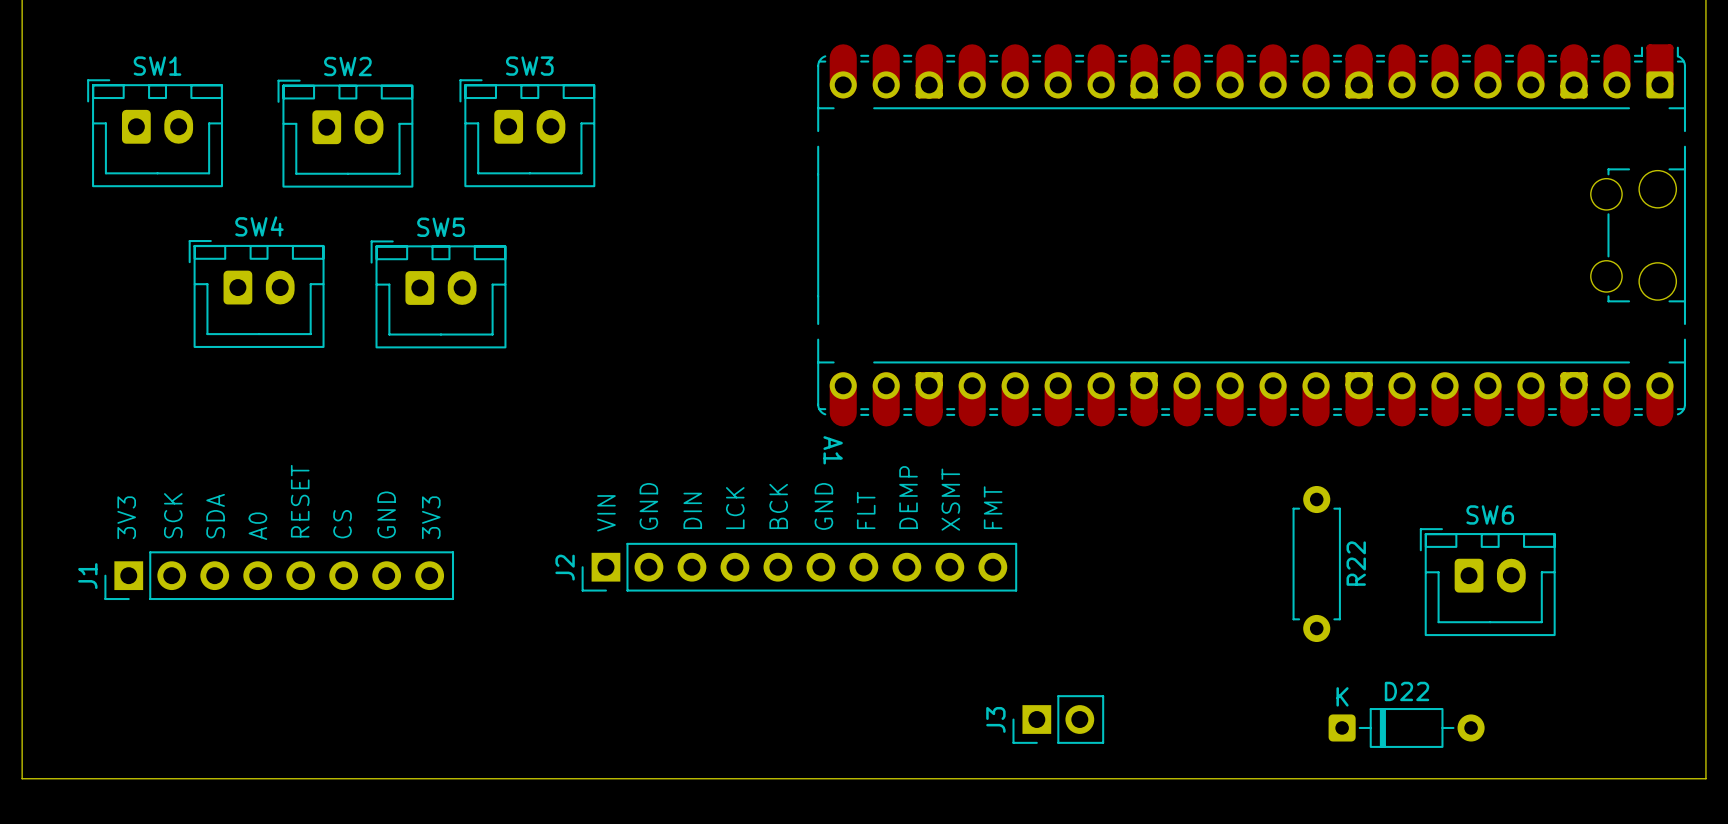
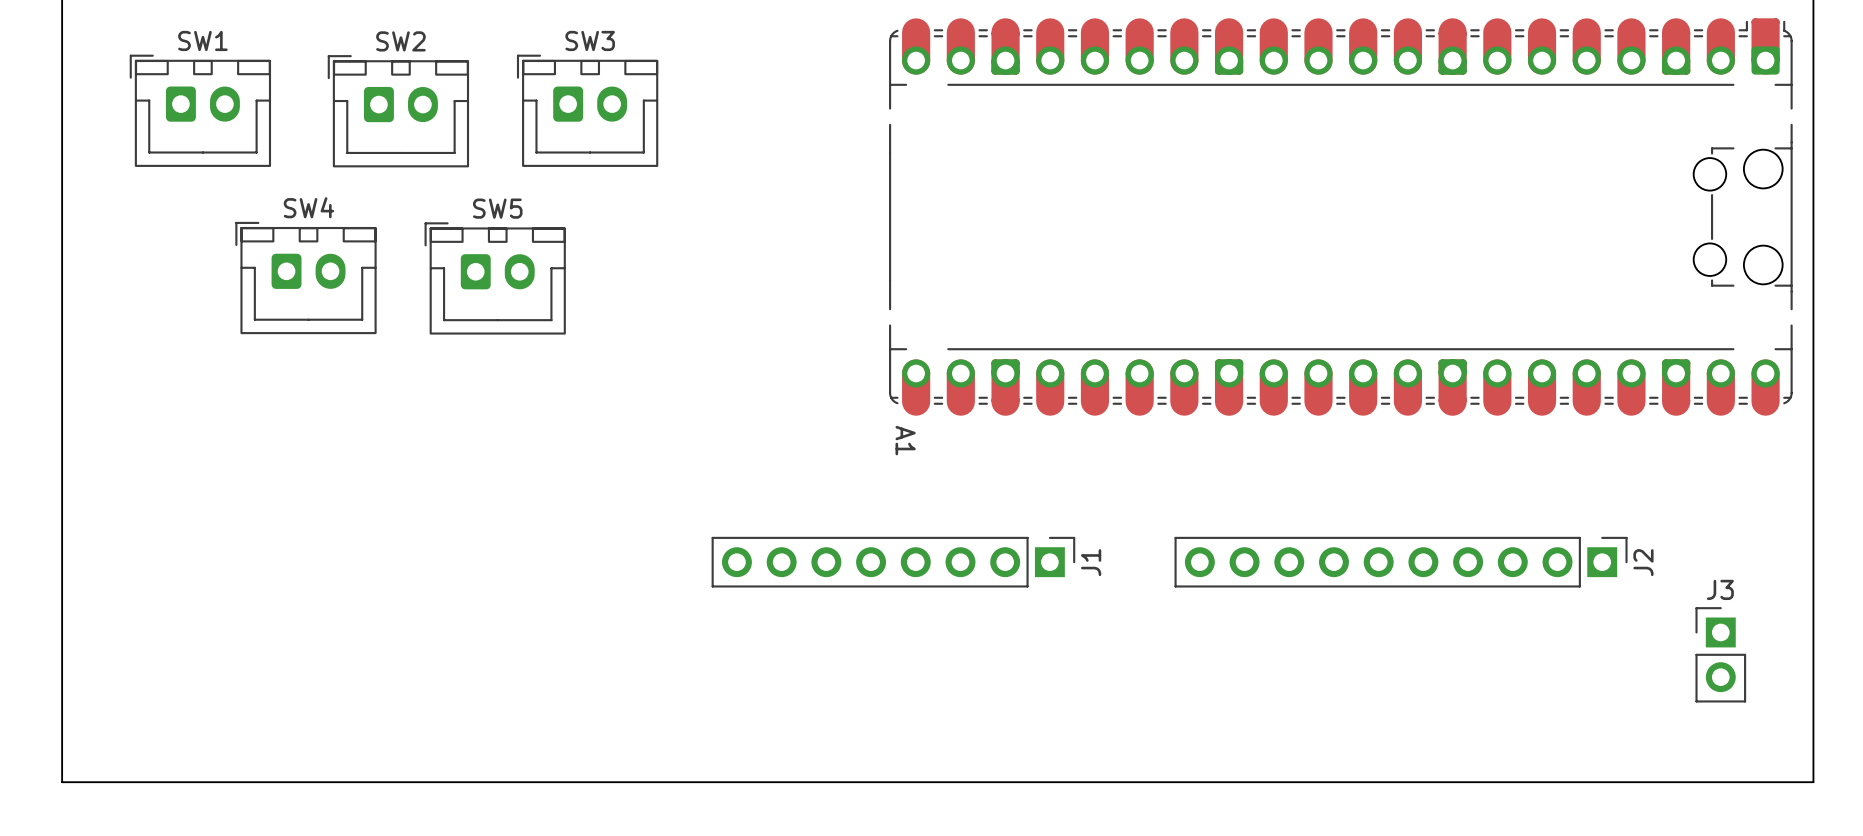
J2 footprint: [581, 542, 1018, 592] -> [1174, 536, 1628, 588]
J1 footprint: [104, 551, 455, 601] -> [711, 536, 1076, 588]
R22: (1316, 563) -> none
J2 name position: J2 (565, 567) -> J2 (1643, 562)
J1 name position: J1 (87, 576) -> J1 (1091, 562)
SW6: (1487, 582) -> none
J3 rotation: 0° (1058, 719) -> 90° clockwise (1720, 654)
J3 position: (1058, 719) -> (1720, 654)
D22: (1406, 727) -> none

